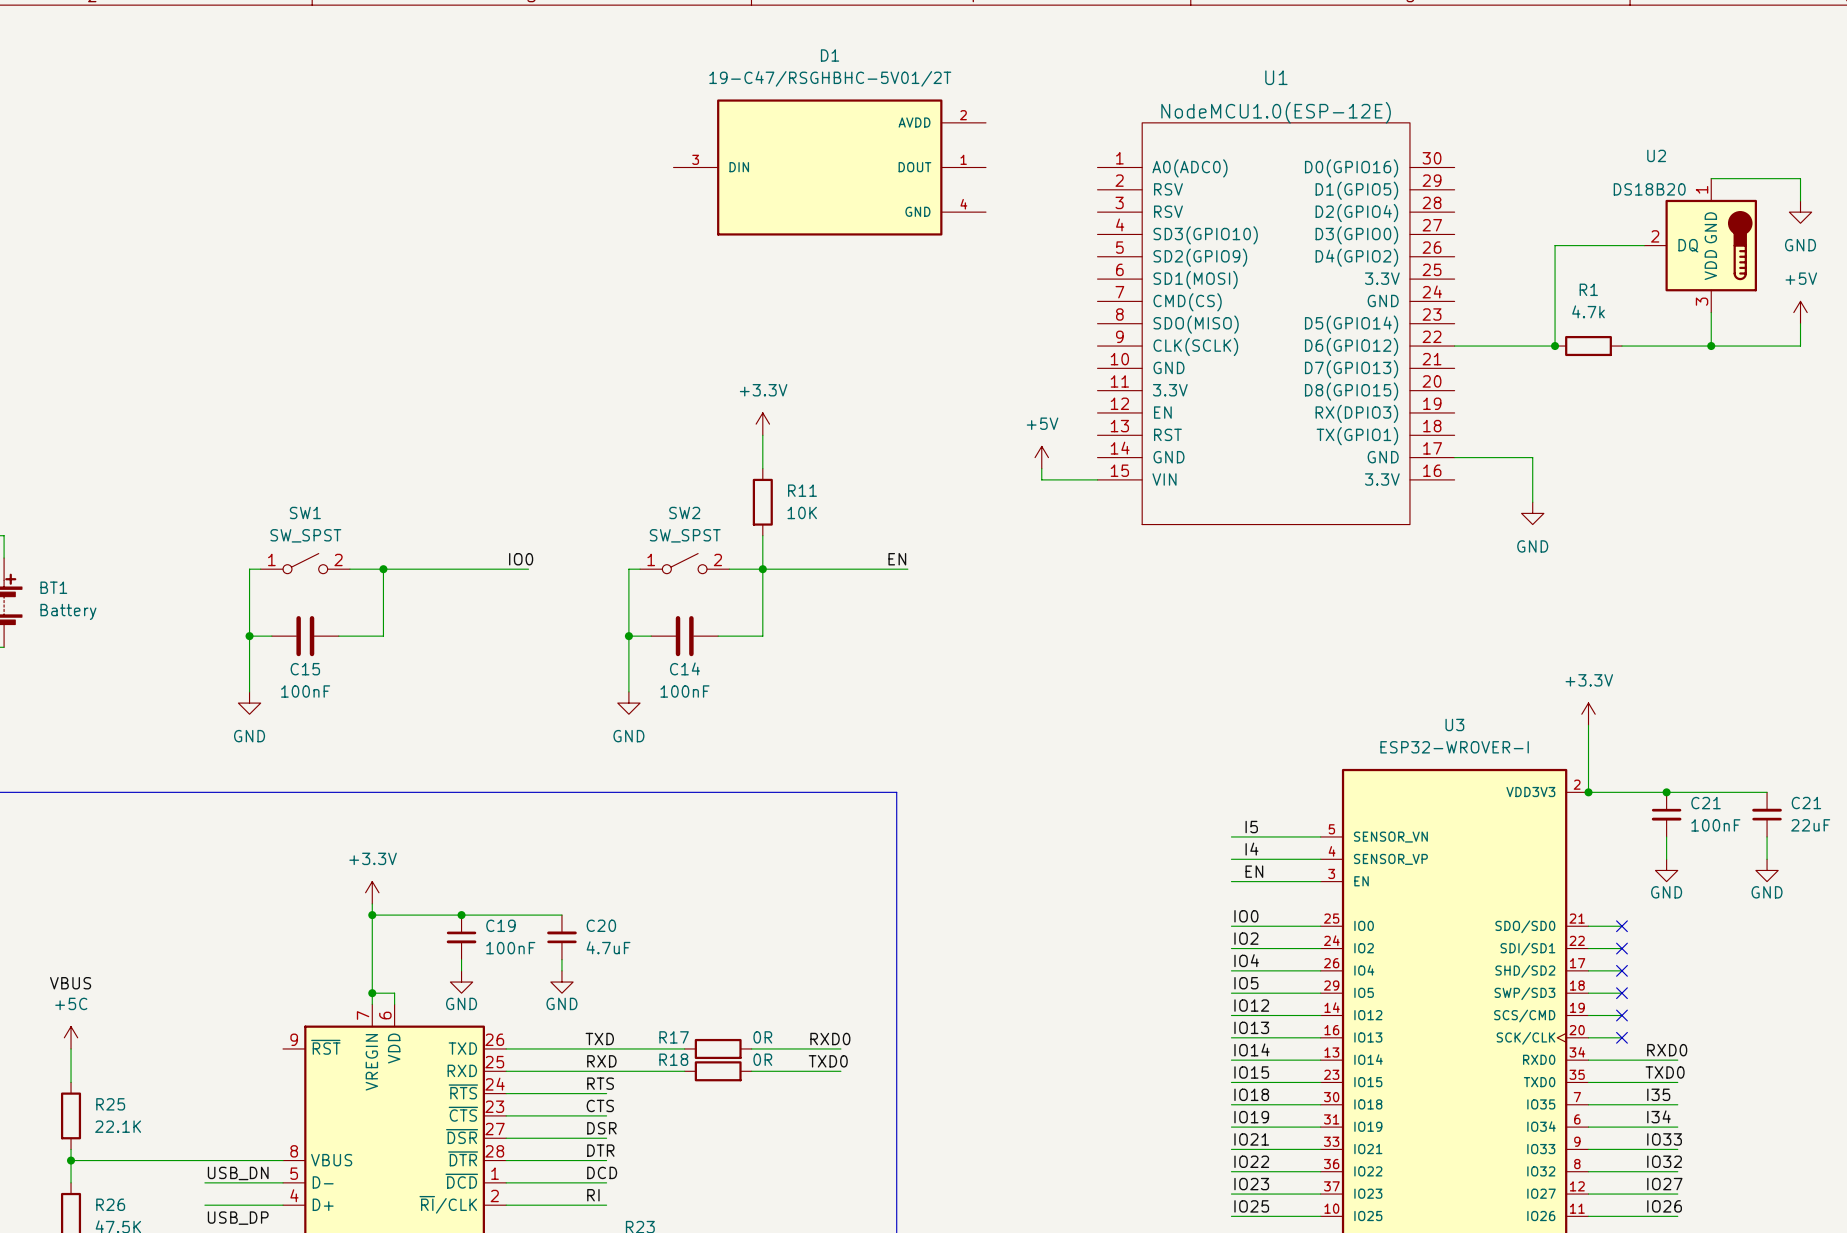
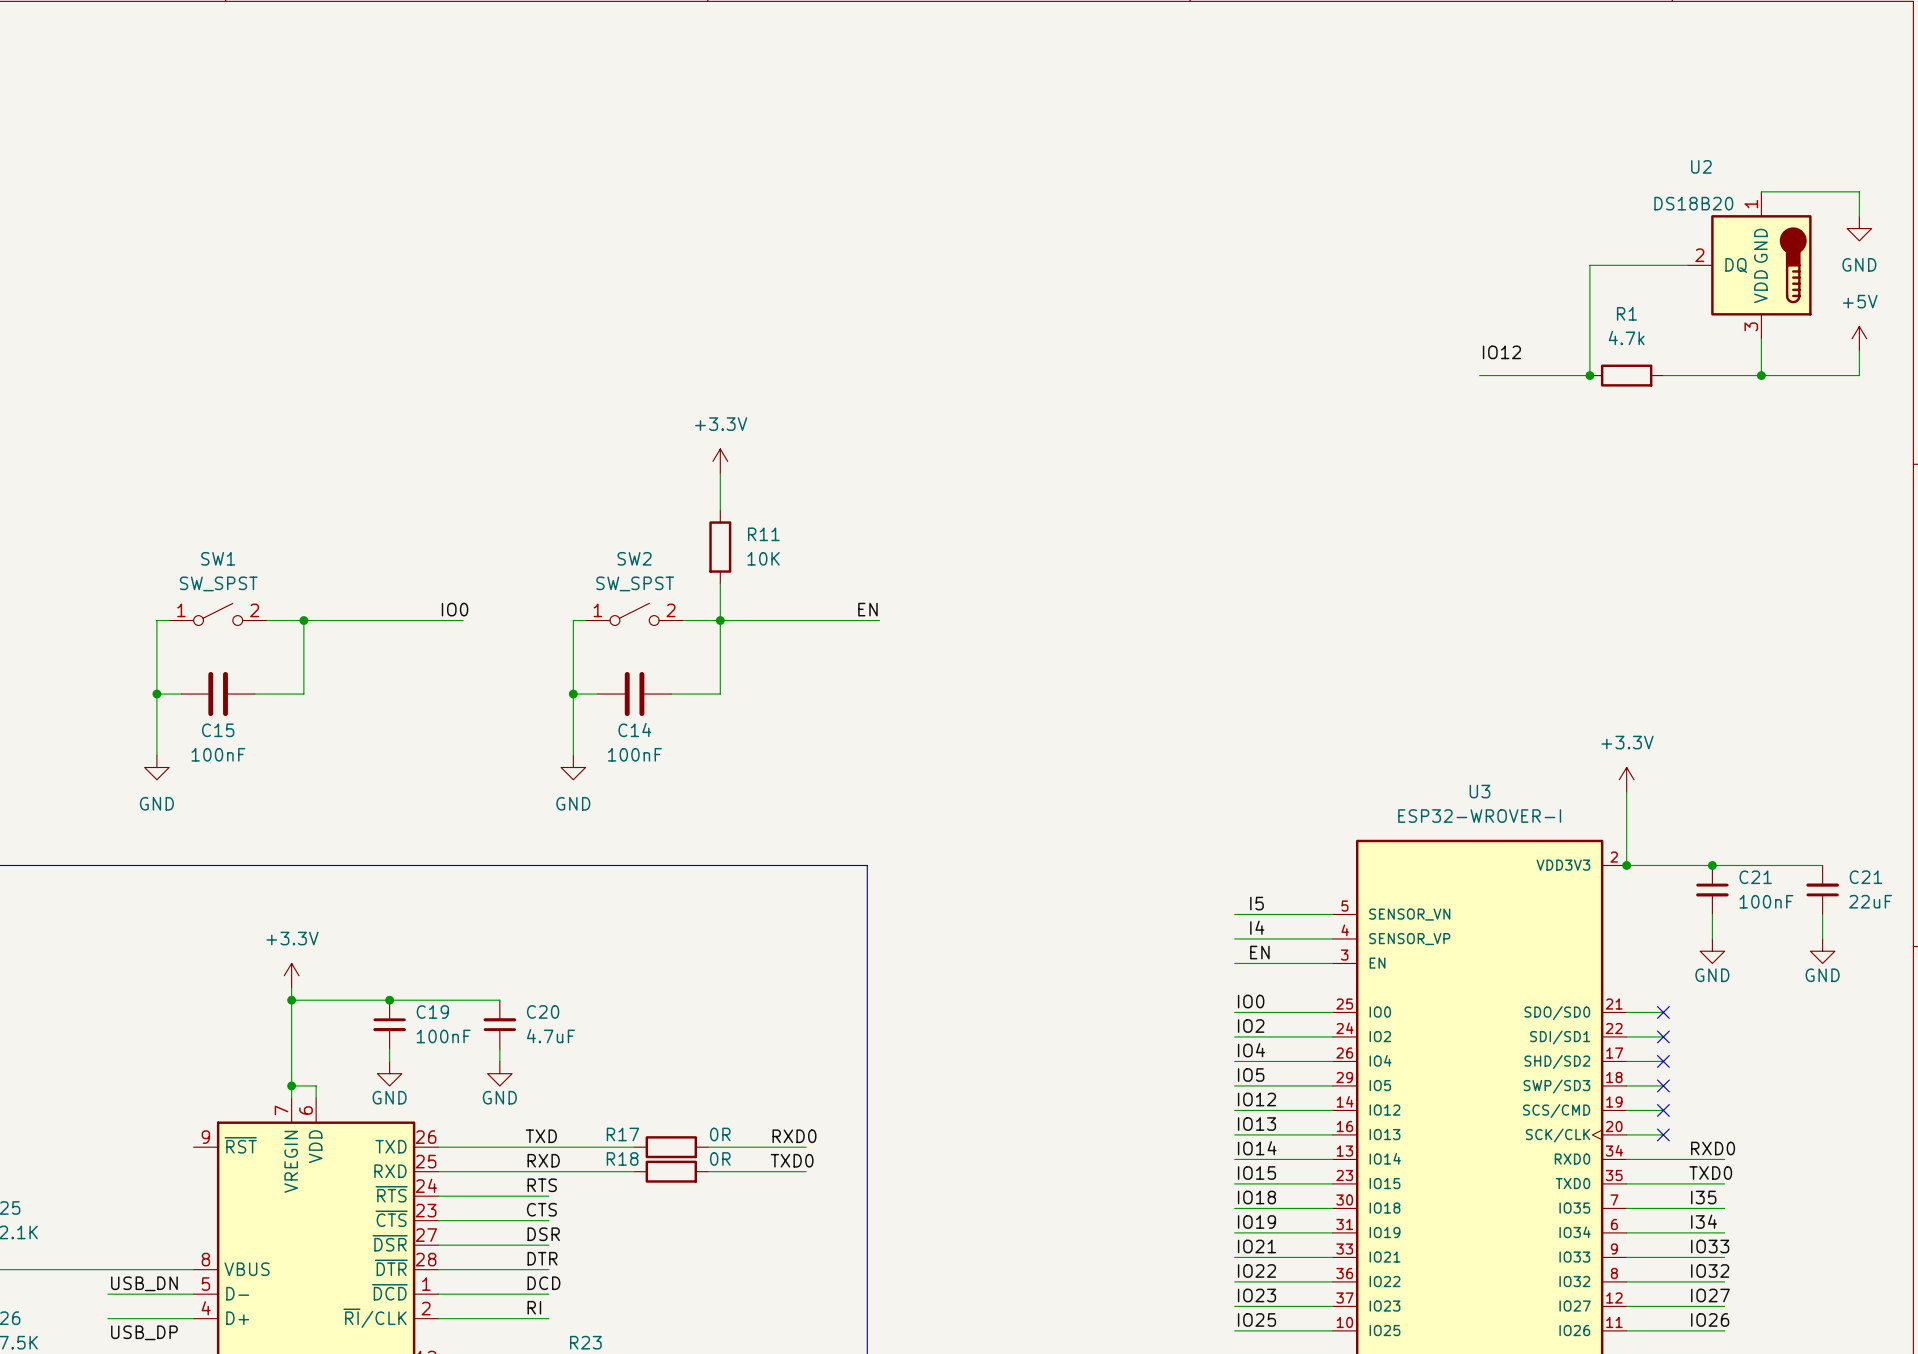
D1: 19-C47/RSGHBHC-5V01/2T (829, 167) -> none
U1: NodeMCU1.0(ESP-12E) (1276, 323) -> none
label: none -> IO12 (1501, 352)
power symbol: +5V (1041, 457) -> none
wire: (1454, 457) (1532, 457) (1532, 502) -> none
wire: (1041, 468) (1041, 479) (1097, 479) -> none
power symbol: GND (1532, 513) -> none

